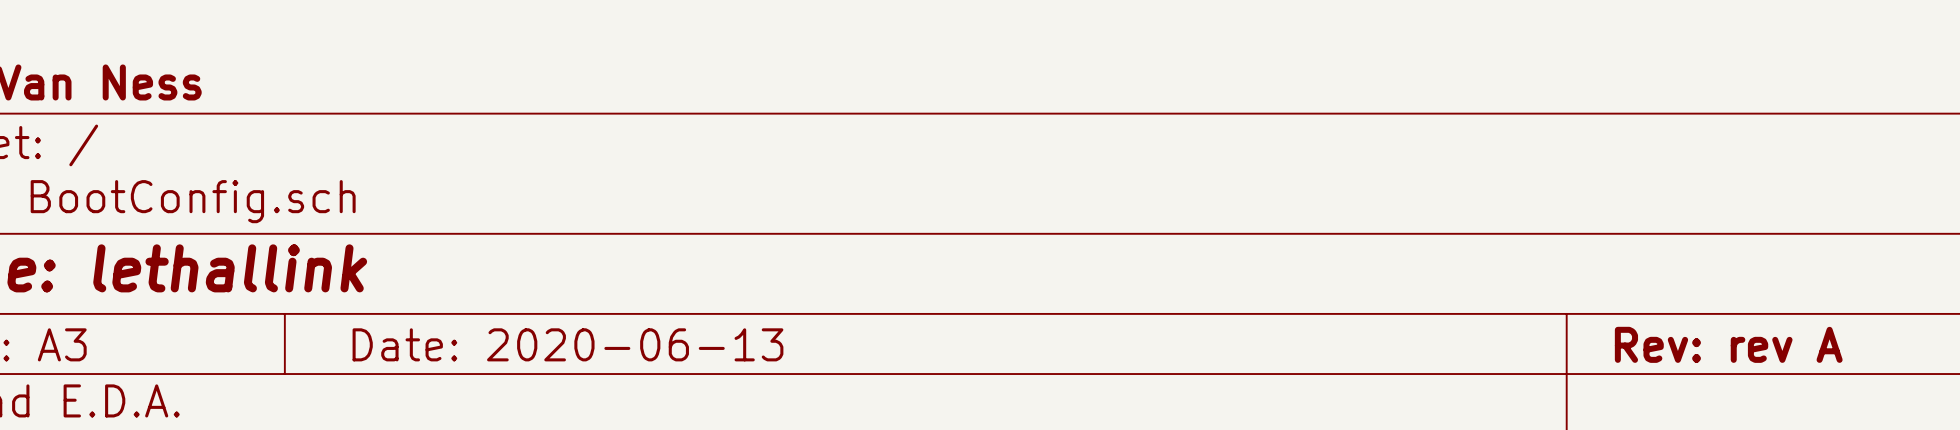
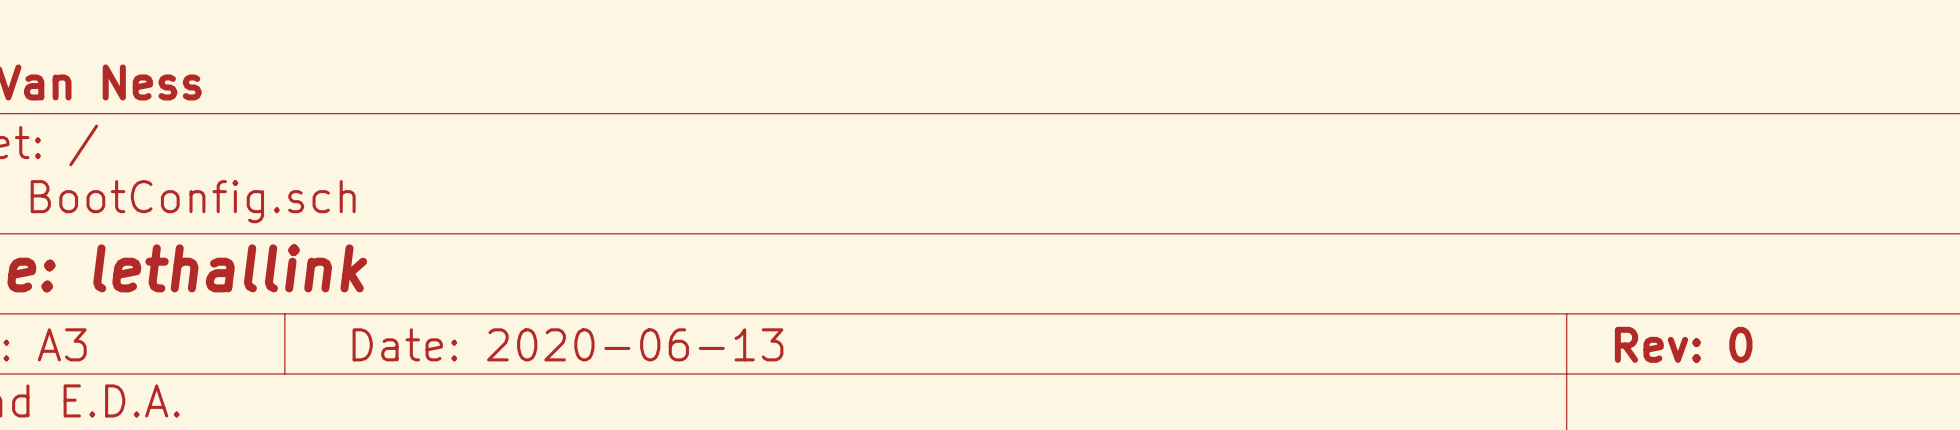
title block: Rev: rev A (1728, 344) -> Rev: 0 (1683, 344)

